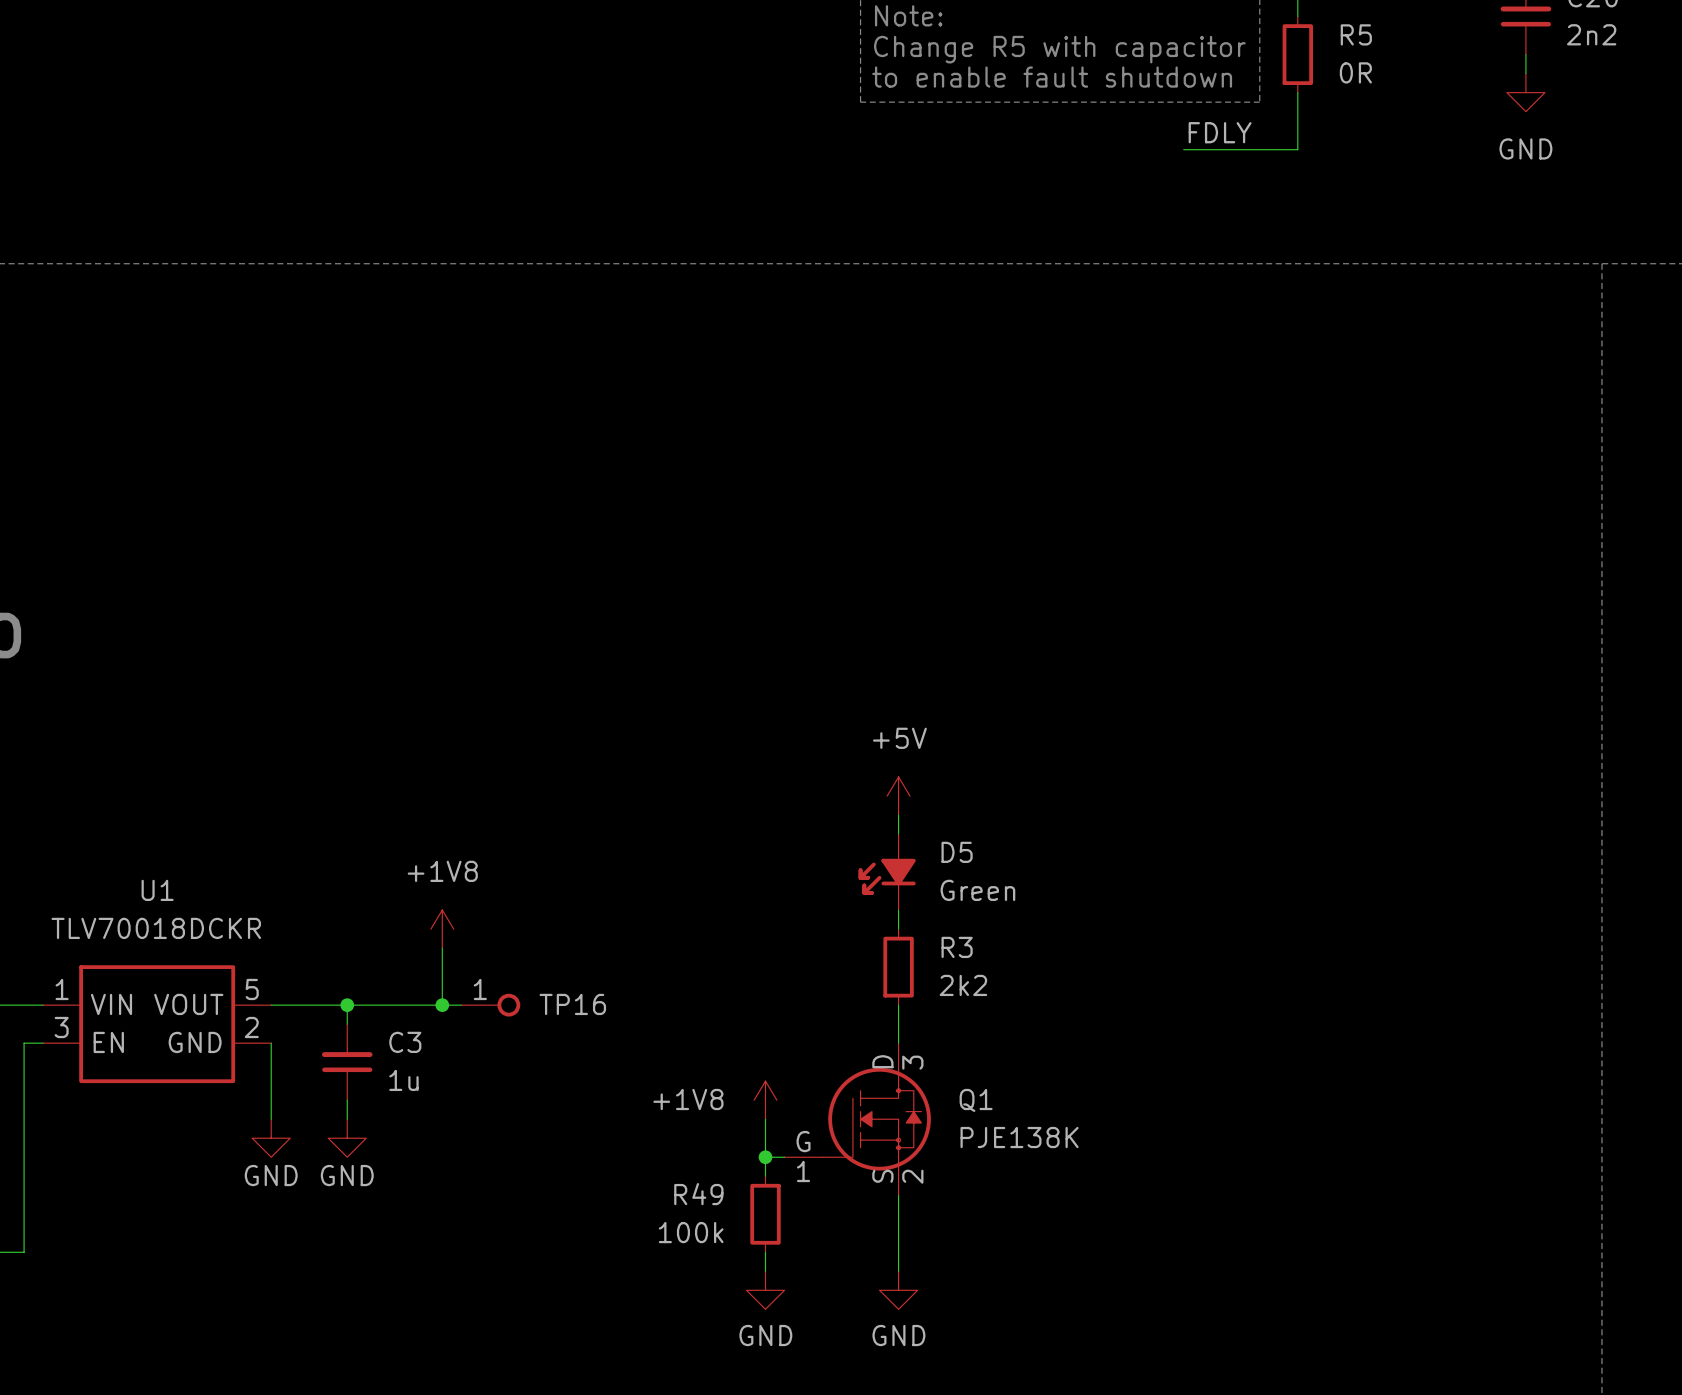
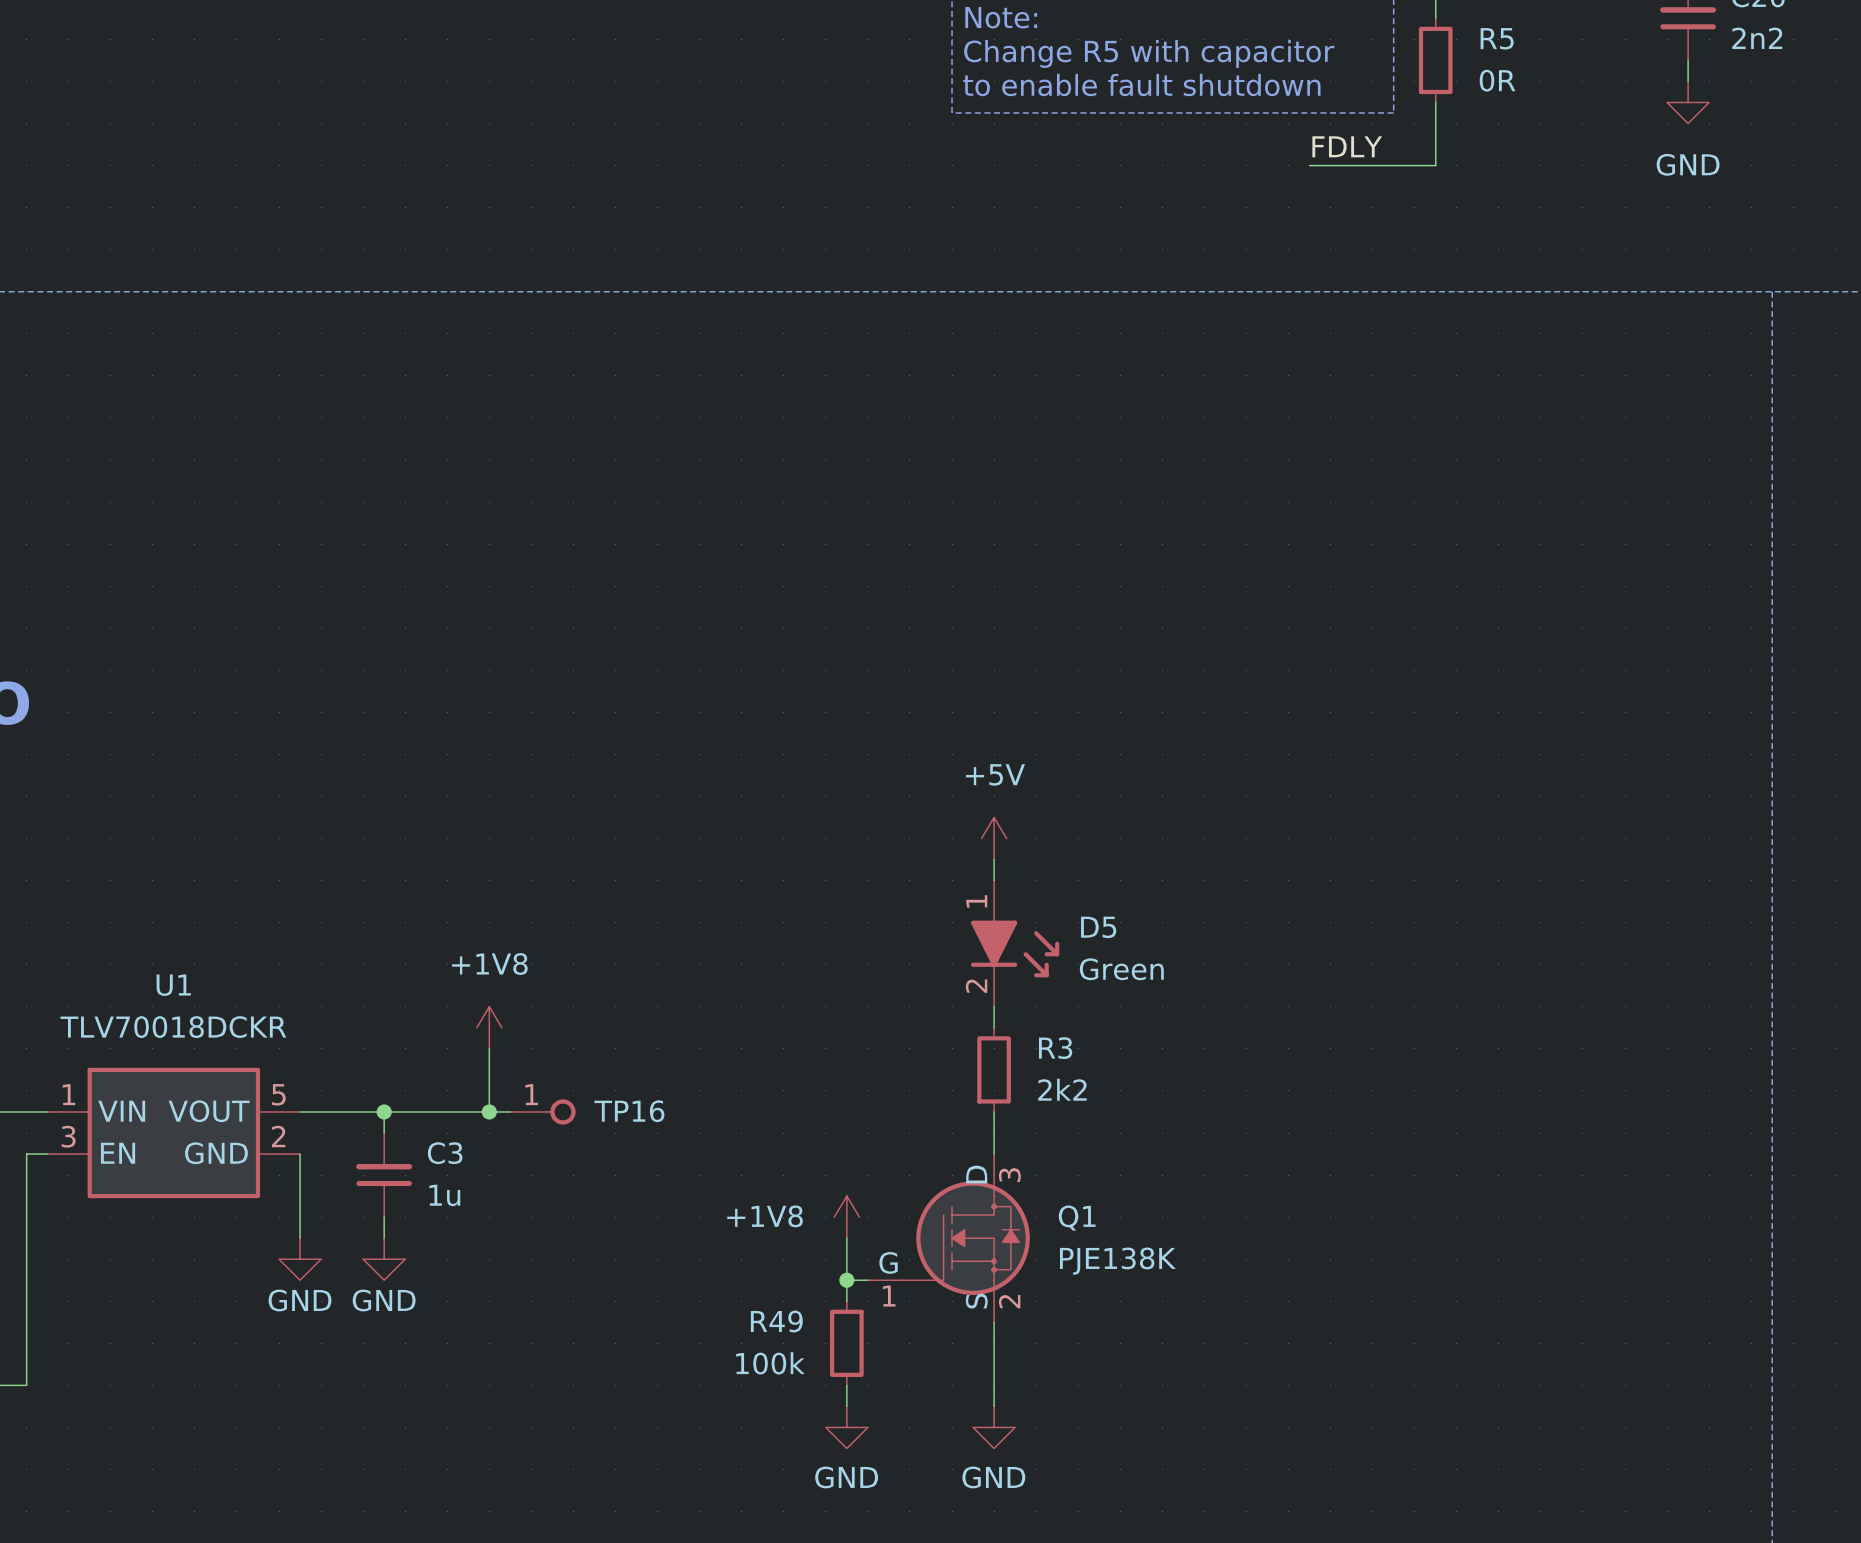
power symbol position: +5V (898, 796) -> +5V (994, 838)
D5 symbol: [858, 834, 916, 911] -> [970, 880, 1060, 1007]

